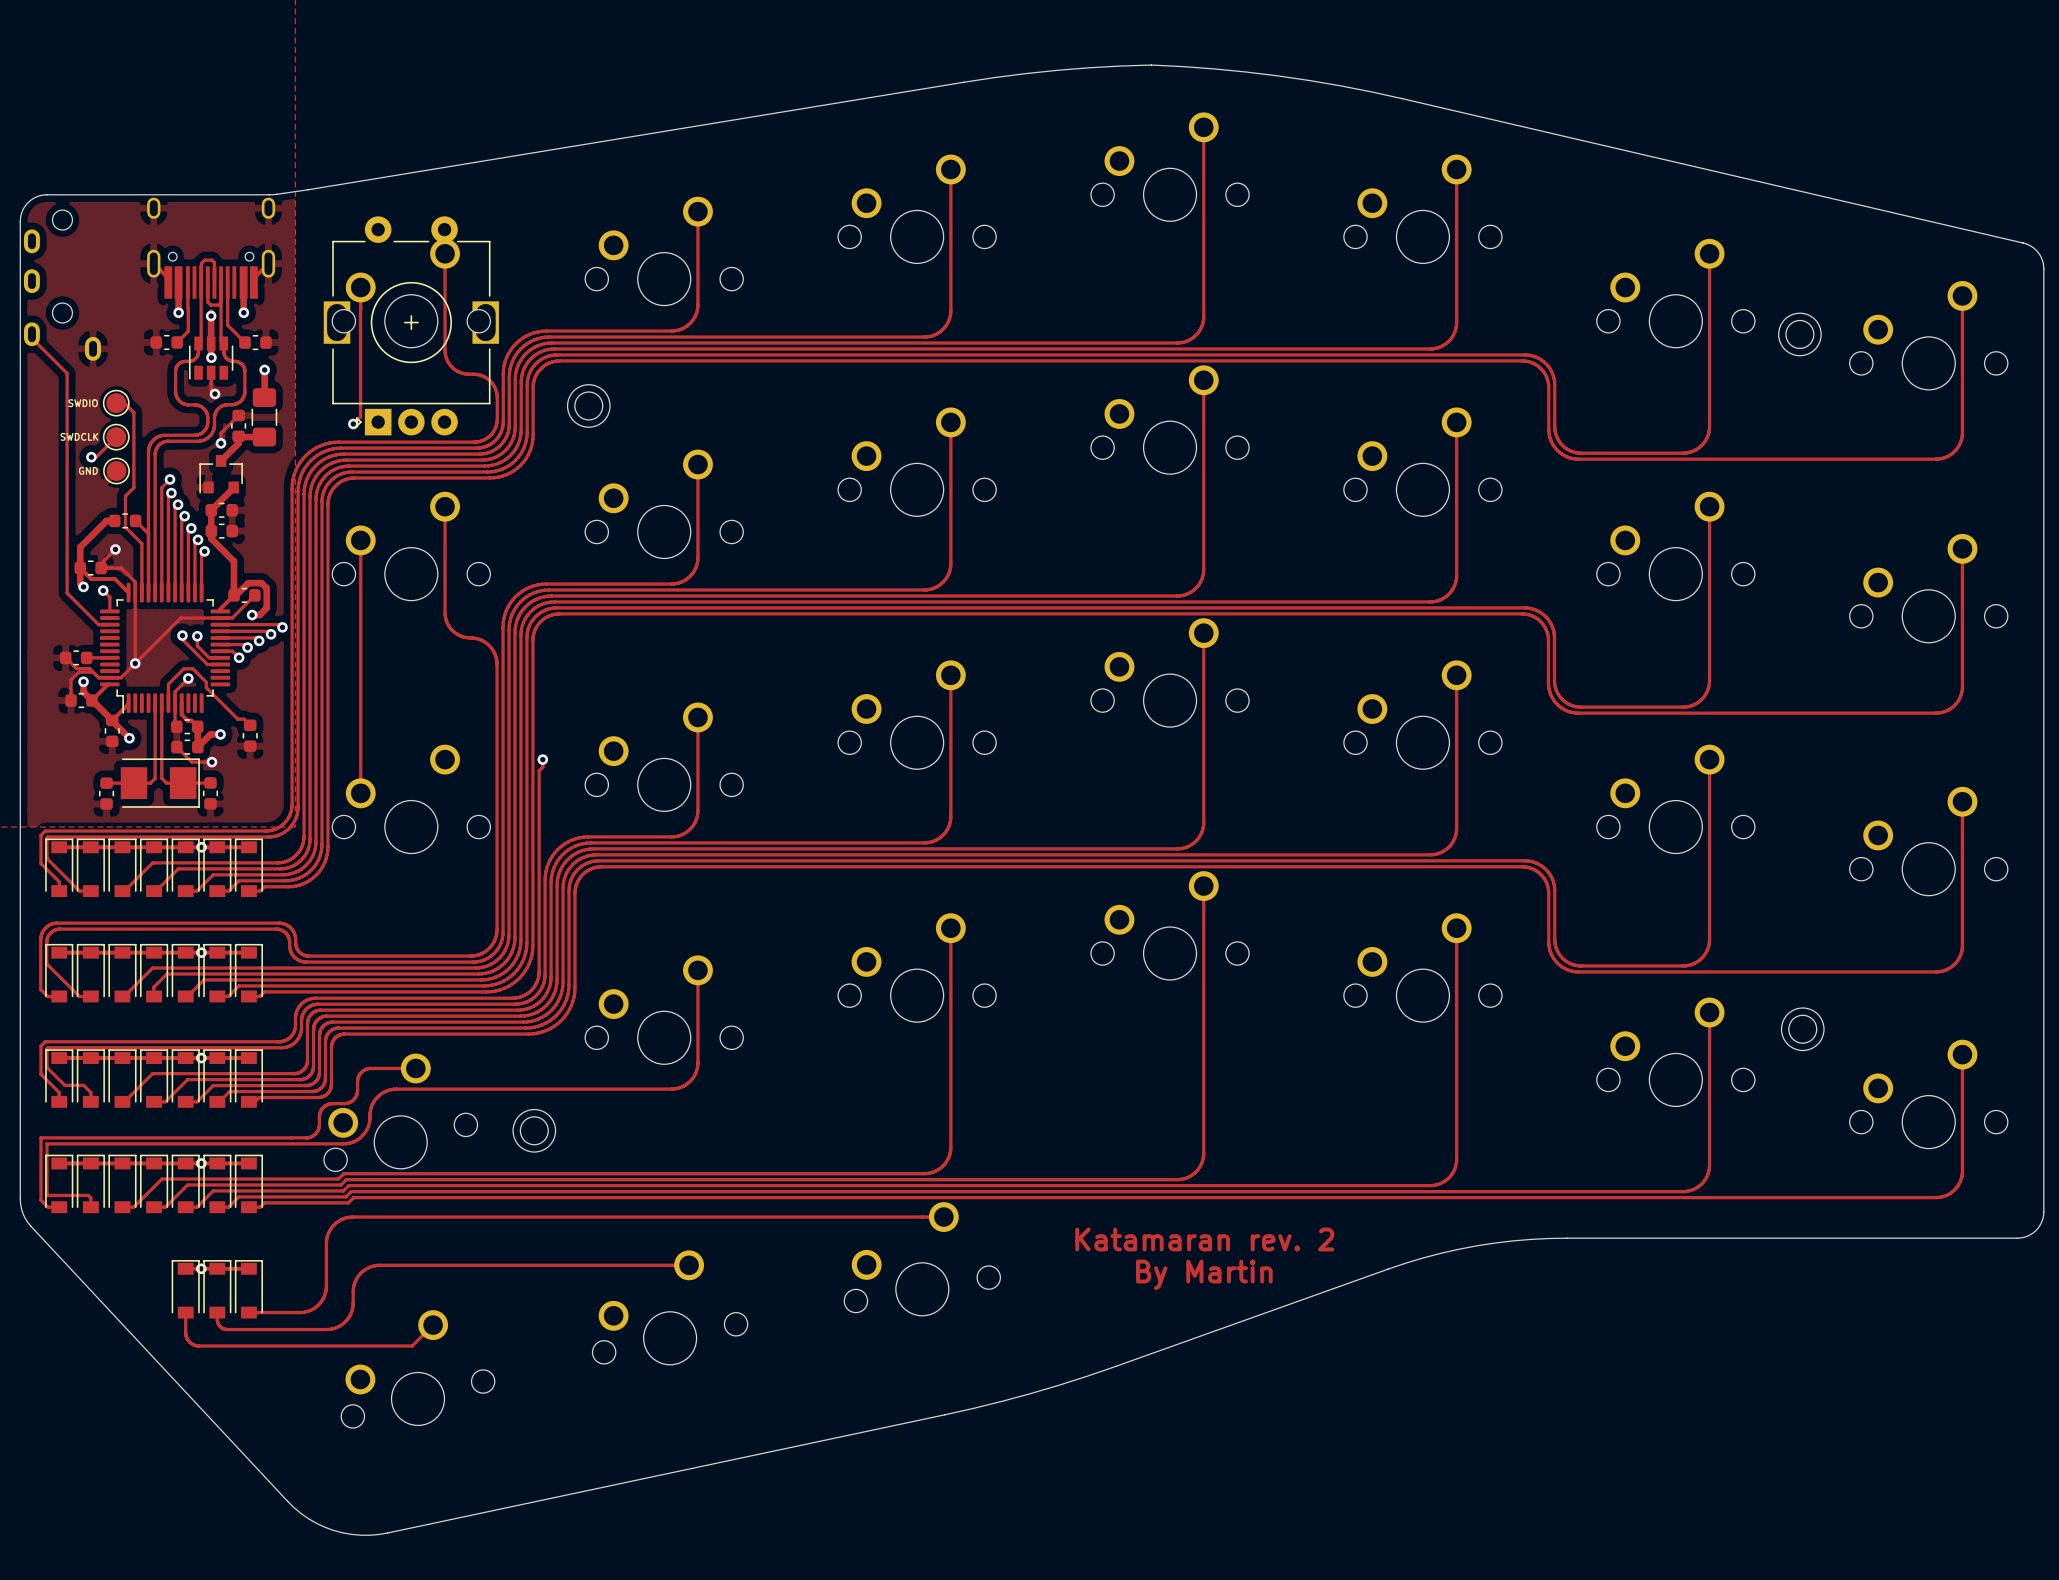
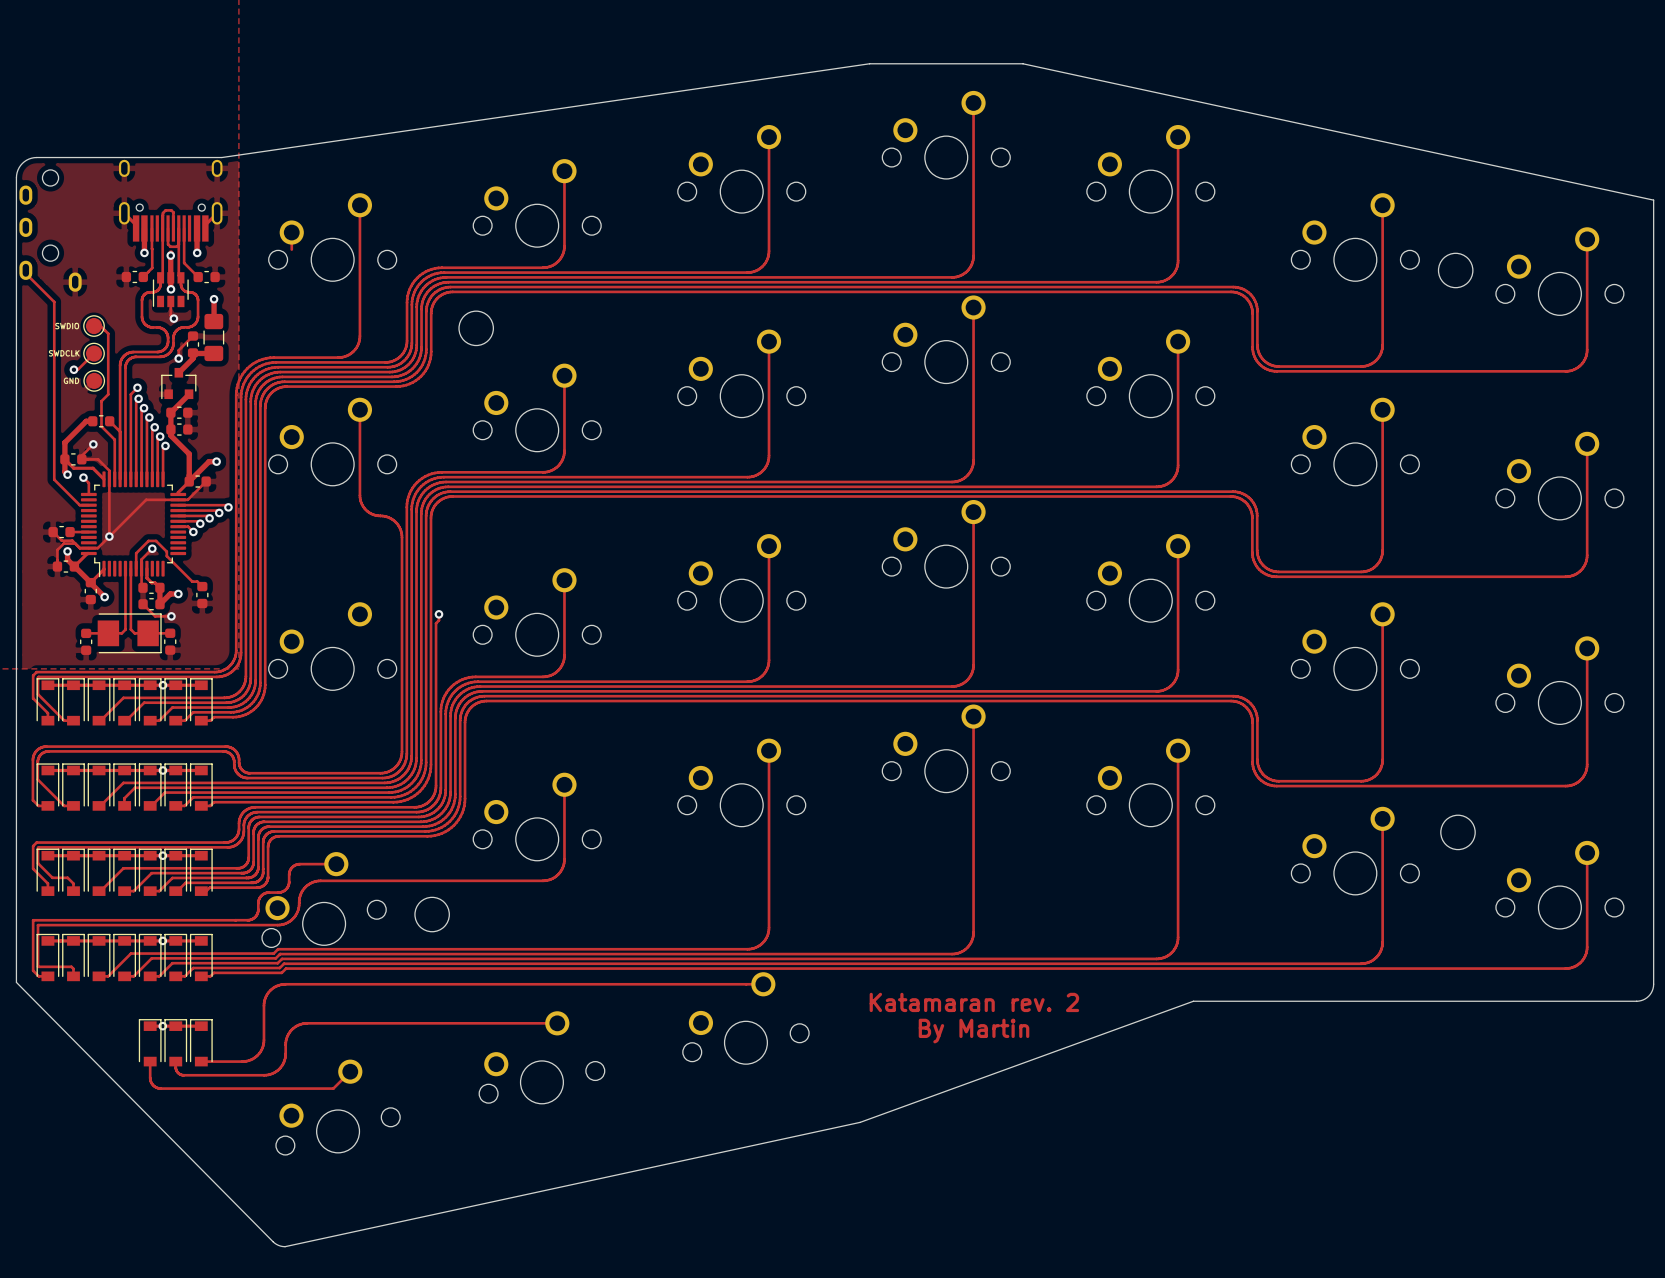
board edge: (308, 189) (994, 77) (1088, 67) (1151, 65) (1214, 68) (1277, 75) (1371, 91) (2023, 243) -> none
board edge: (277, 194) (43, 195) (30, 200) (21, 214) (20, 1199) (23, 1213) (31, 1226) (294, 1507) (308, 1518) (324, 1527) (342, 1532) (360, 1535) (387, 1533) (1002, 1401) (1087, 1375) (1405, 1263) (1476, 1245) (1548, 1238) (2017, 1238) (2033, 1232) (2041, 1221) (2043, 1211) (2043, 268) (2042, 260) (2037, 252) (2031, 246) (2022, 242) -> (224, 157) (34, 157) (24, 161) (17, 172) (16, 982) (276, 1244) (285, 1246) (860, 1122) (1193, 1001) (1636, 1001) (1645, 998) (1651, 992) (1653, 984) (1653, 200) (1022, 63) (869, 63) (249, 153)
track: (360, 308) (360, 416) (353, 423) -> none
round board edge: [1785, 320, 1815, 349] -> none
part: (411, 325) -> none
track: (445, 350) (447, 361) (455, 370) (464, 373) (482, 376) (493, 384) (497, 395) (496, 425) (488, 436) (478, 441) (418, 442) -> (359, 283) (359, 342) (350, 353) (338, 357)
round board edge: [574, 391, 604, 421] -> none
via: (353, 423) -> none
track: (360, 540) (360, 793) -> none
track: (234, 595) (234, 597) (248, 583) (261, 583) (266, 588) (266, 608) (259, 615) (252, 615) -> (189, 481) (209, 461) (216, 461)
via position: (252, 615) -> (216, 461)
track: (182, 635) (182, 639) (207, 664) (220, 664) -> none
via: (182, 635) -> none
track: (197, 636) (197, 645) (209, 657) (220, 657) -> none
via: (197, 636) -> none
round board edge: [1788, 1014, 1818, 1044] -> none
round board edge: [520, 1116, 549, 1146] -> none

